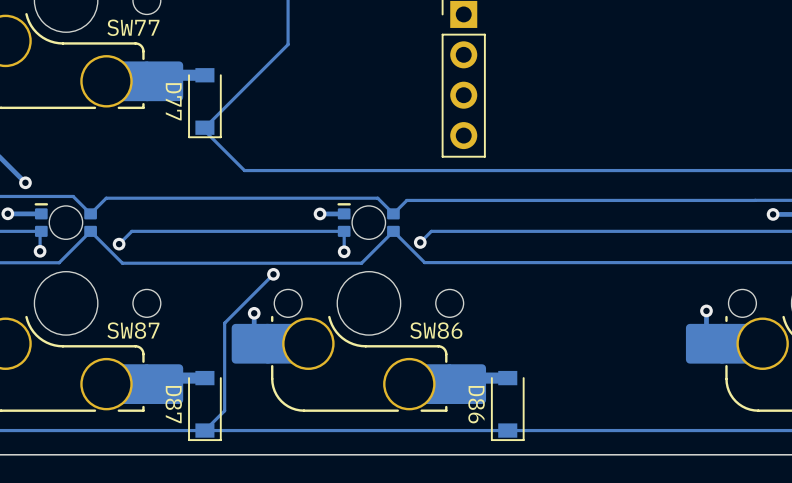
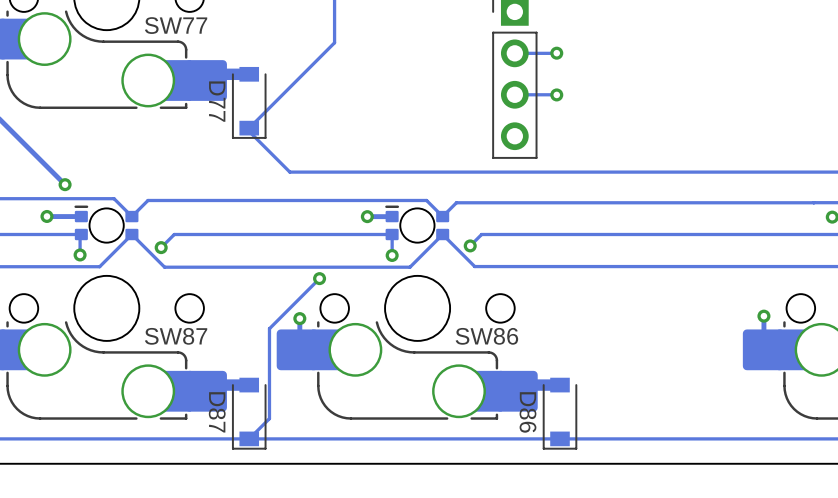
track: none -> (556, 53) (514, 53)
via: none -> (556, 53)
track: none -> (556, 94) (514, 94)
via: none -> (556, 94)

